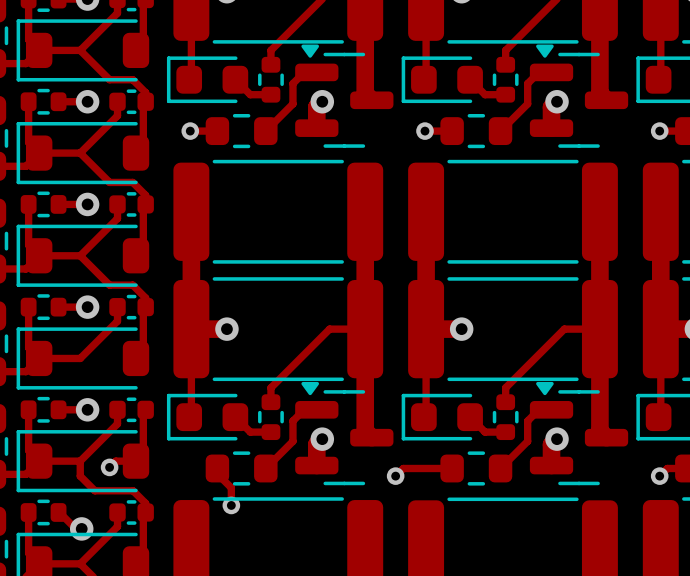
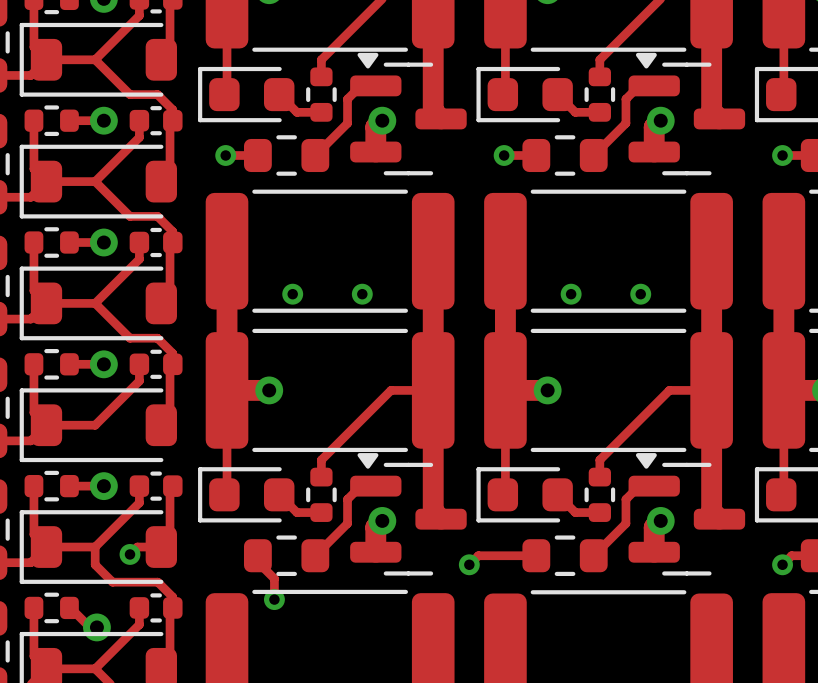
via: none -> (292, 294)
via: none -> (362, 294)
via: none -> (571, 294)
via: none -> (640, 294)

